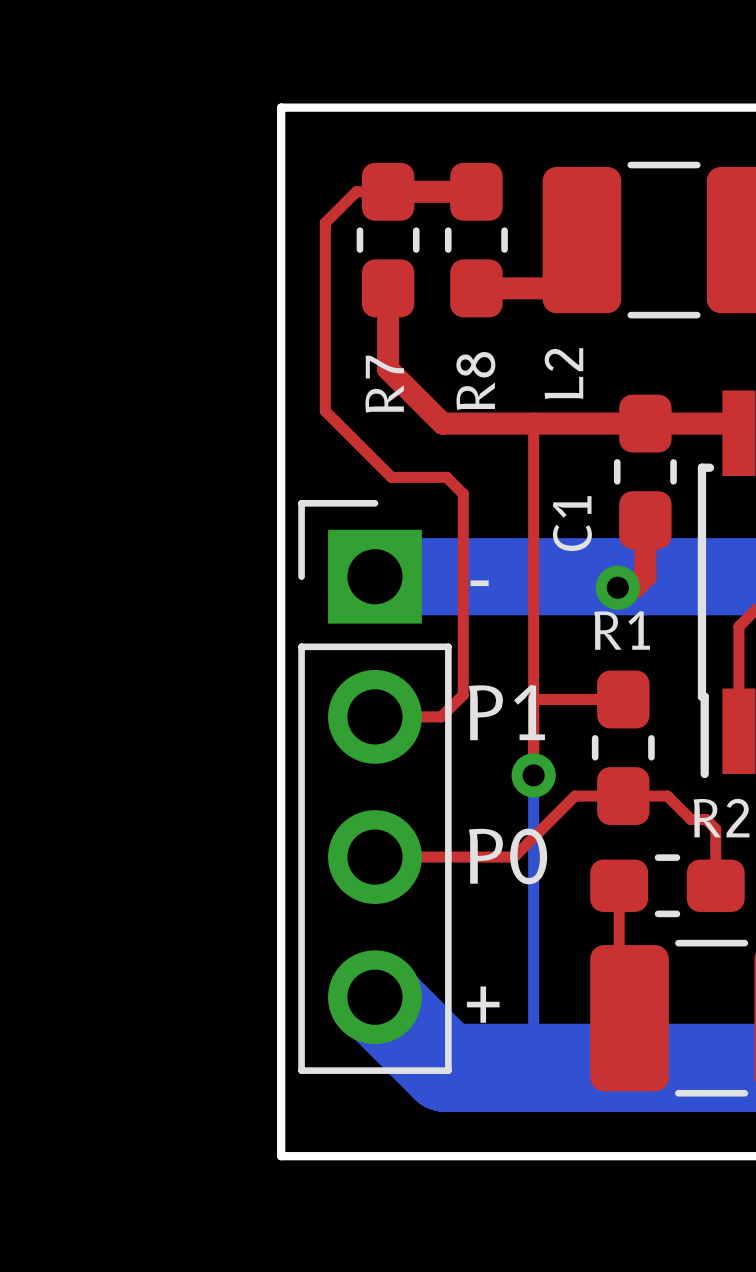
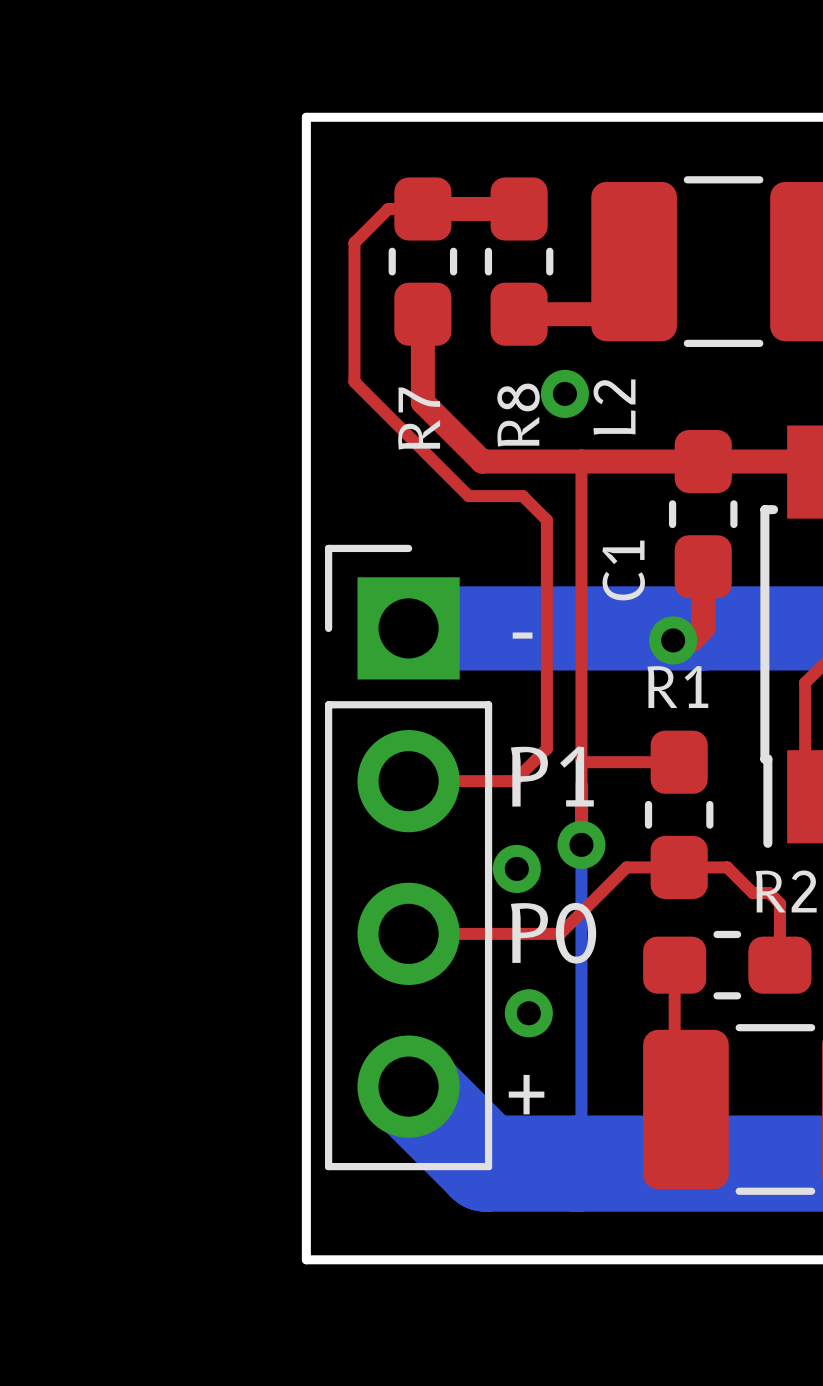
top track: (325, 350) (325, 411) (391, 477) (446, 477) (463, 493) (463, 694) (441, 716) -> (354, 381) (468, 496) (522, 496) (546, 520) (546, 748) (514, 781) (480, 781)
via: none -> (564, 393)
via: none -> (516, 868)
via: none -> (528, 1013)

